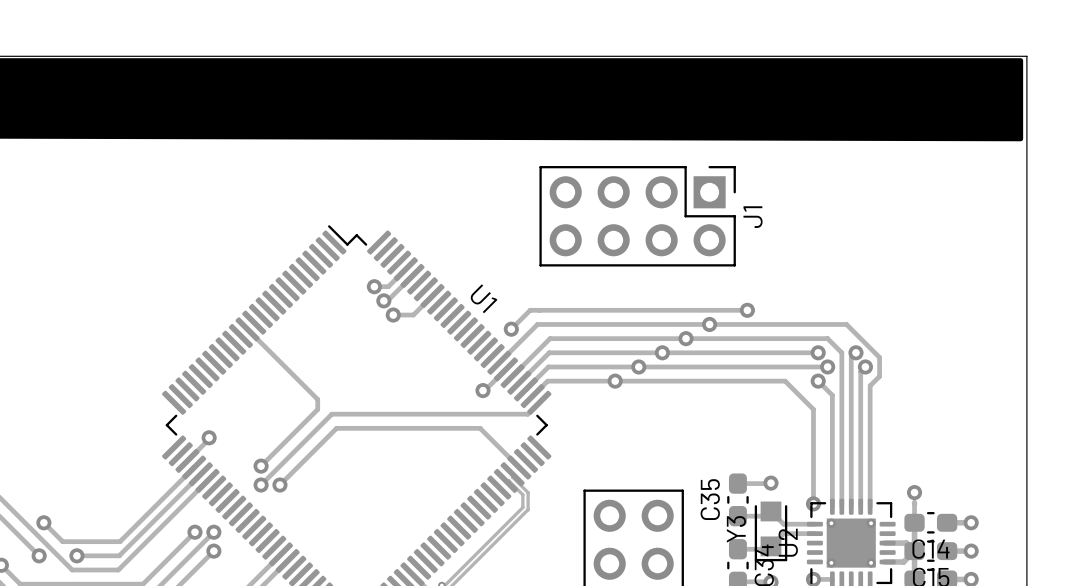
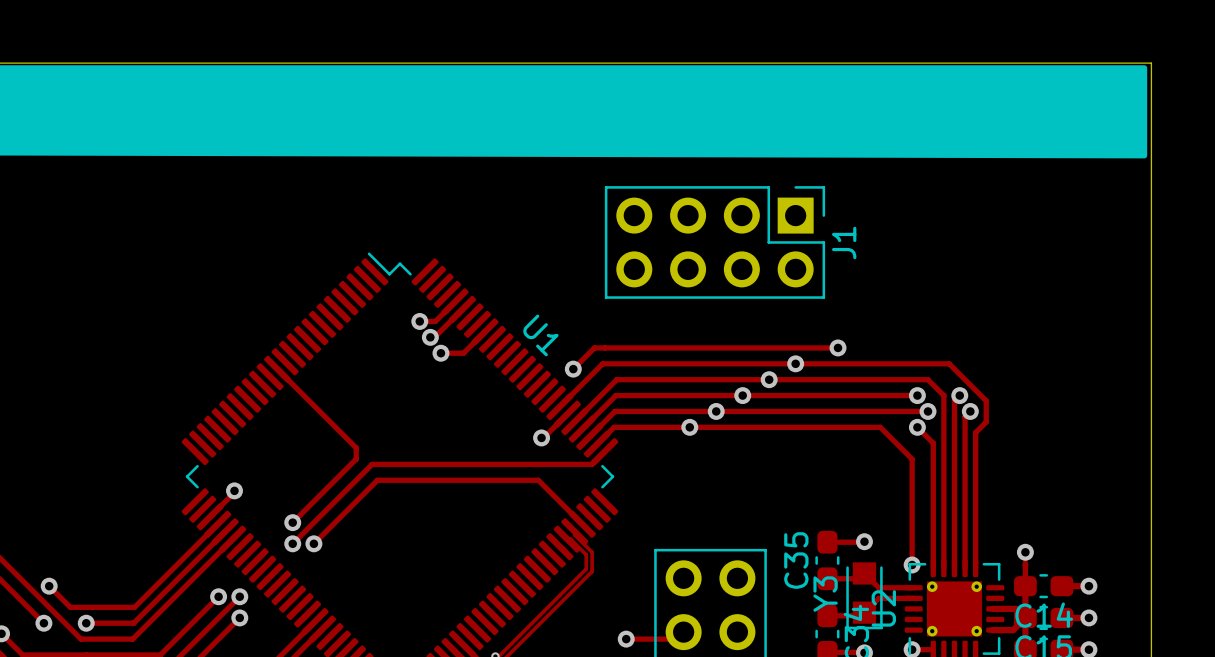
track: none -> (683, 632) (676, 639) (626, 639)
via: none -> (626, 639)

